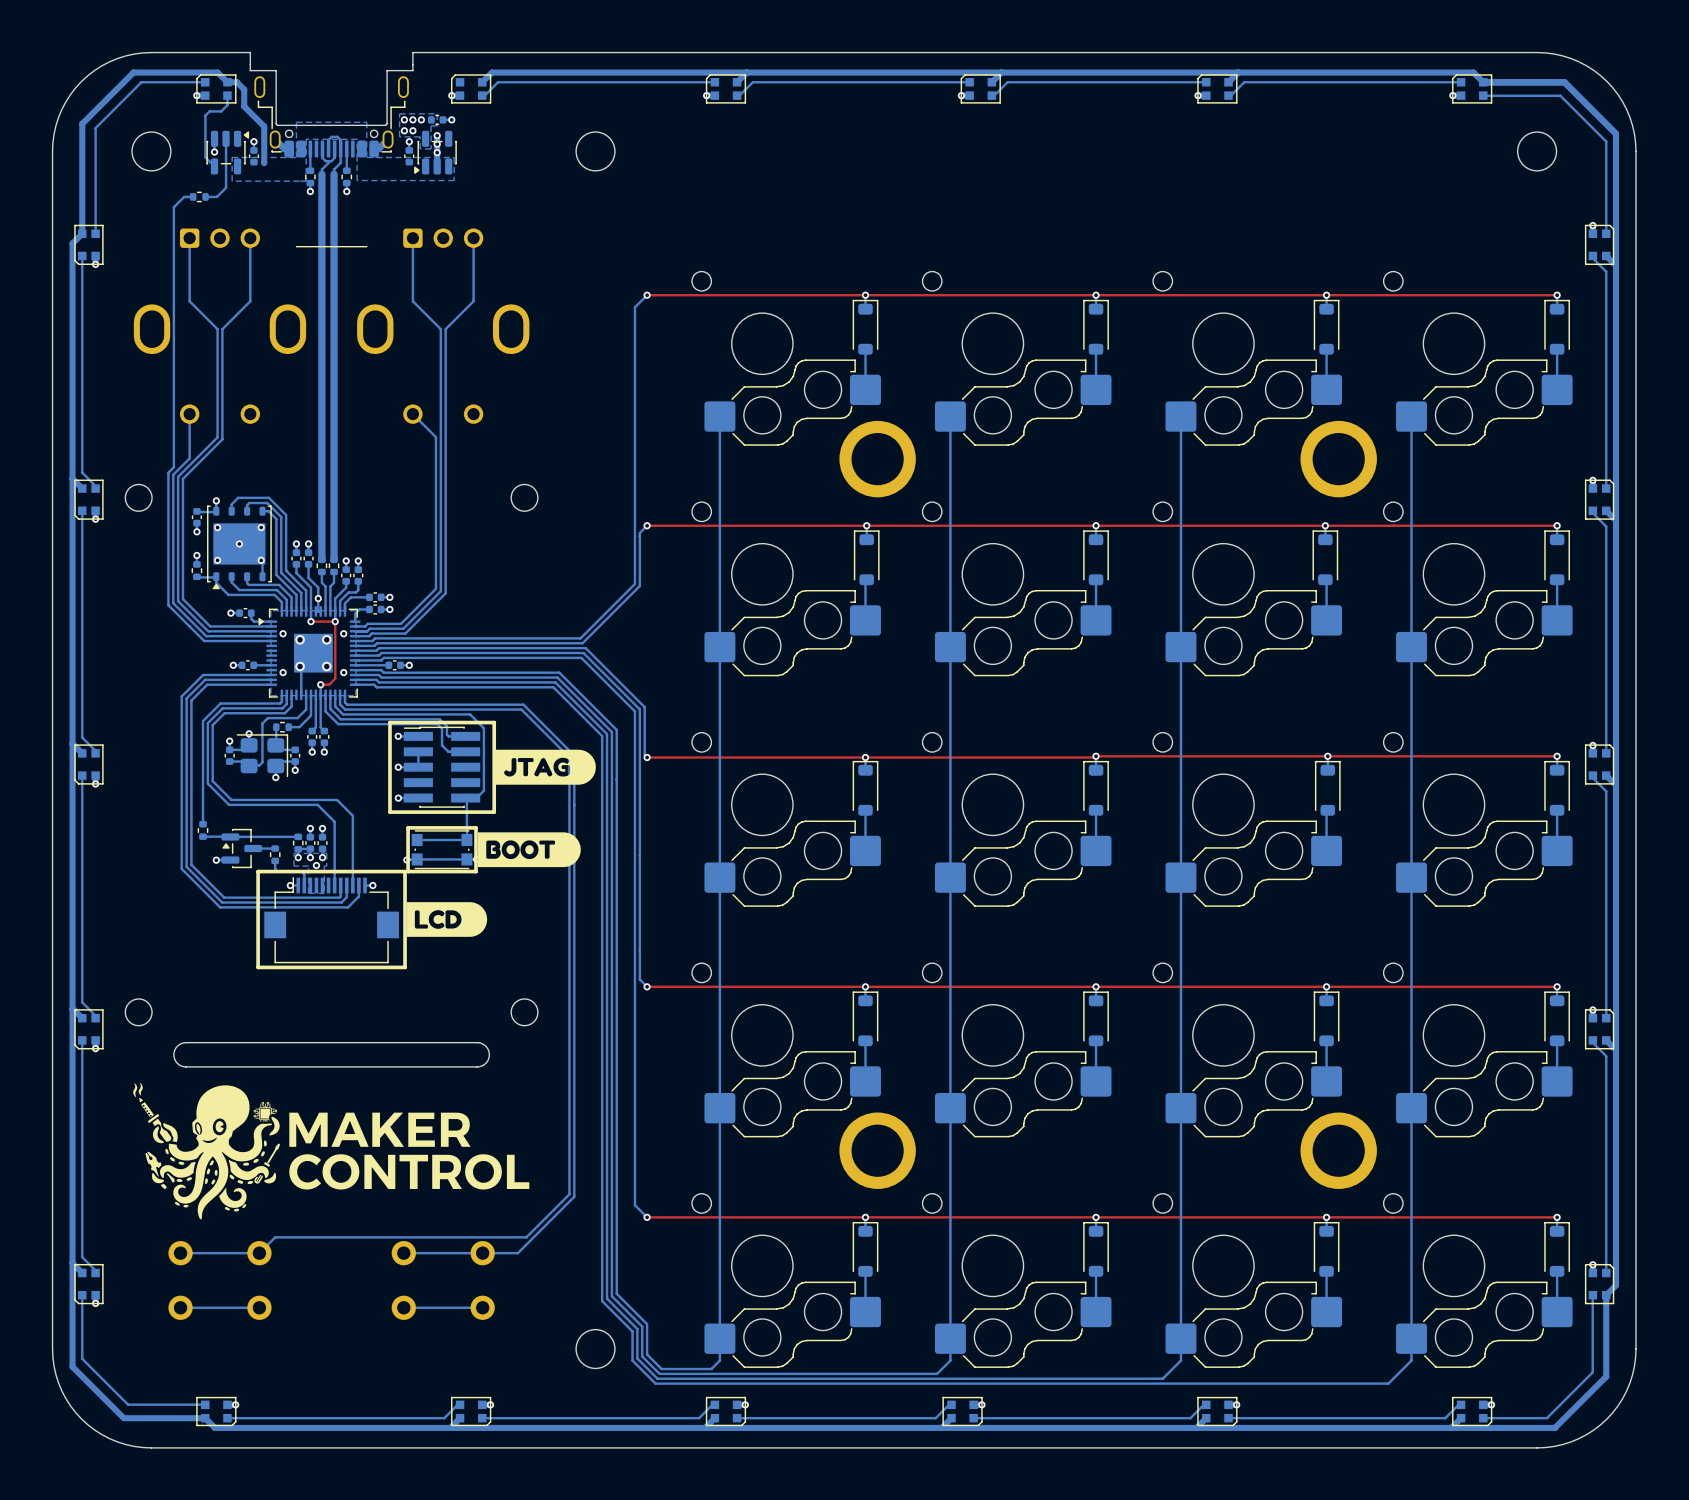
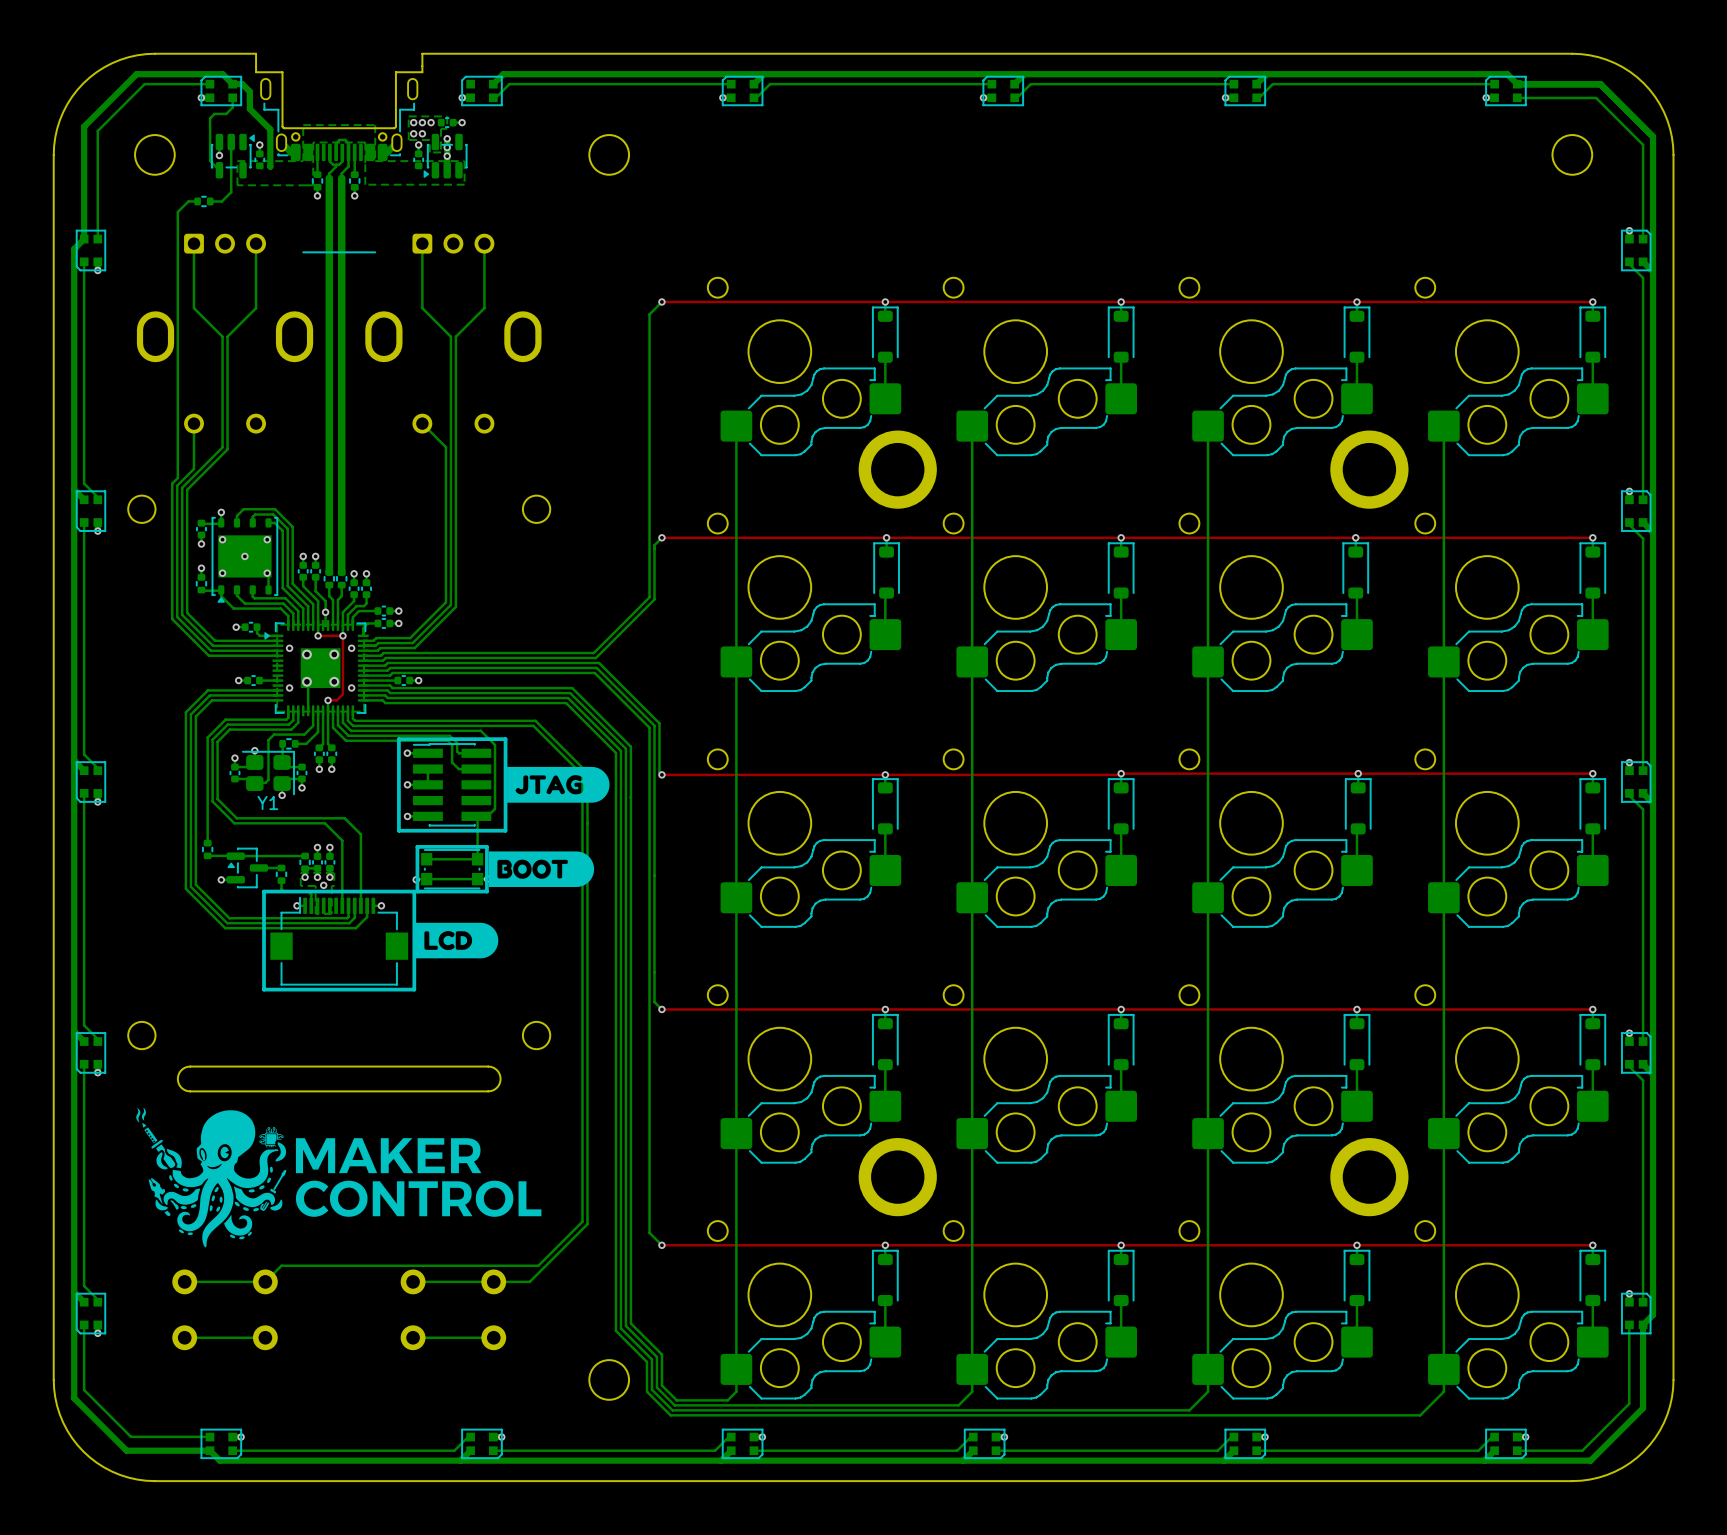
Y1 name: none -> Y1 (267, 802)

